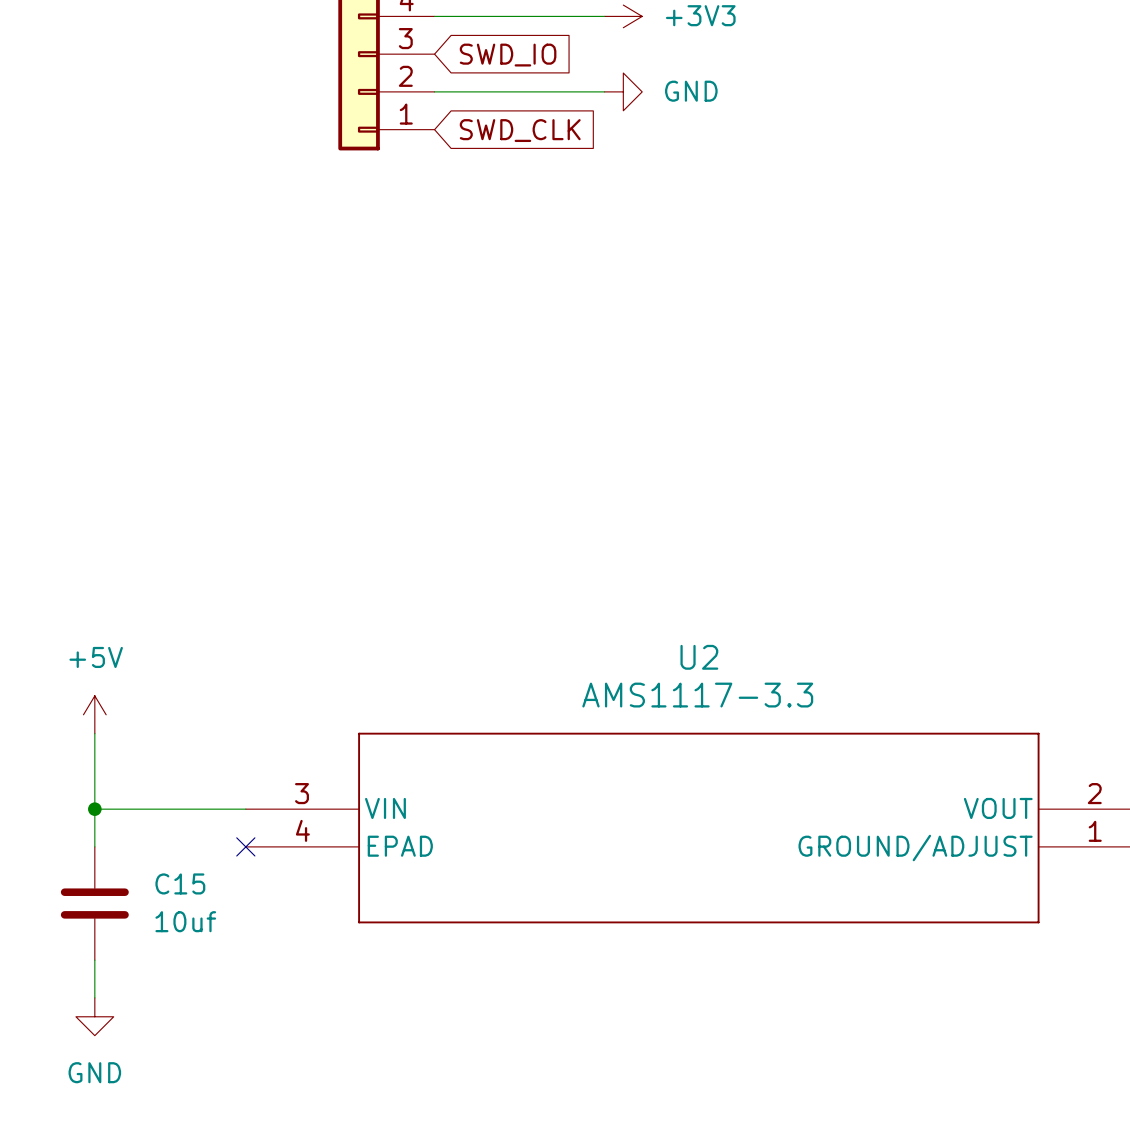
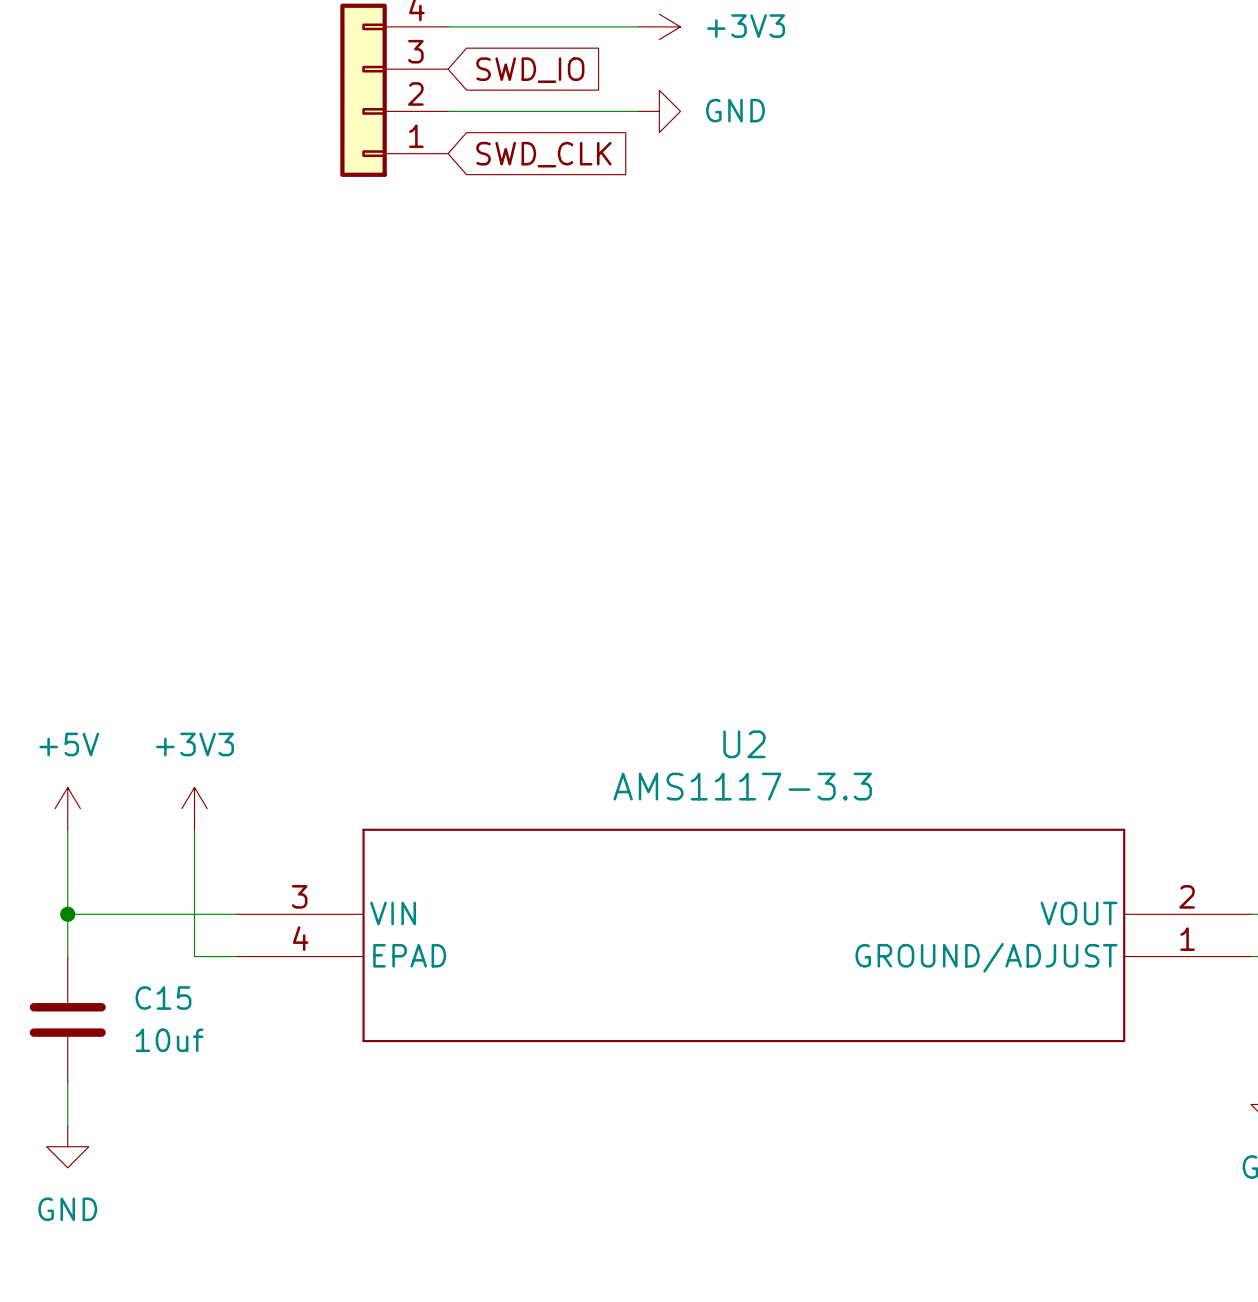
power symbol: none -> +3V3 (194, 808)
wire: none -> (194, 829) (194, 956) (236, 956)
no-connect mark: (245, 846) -> none

